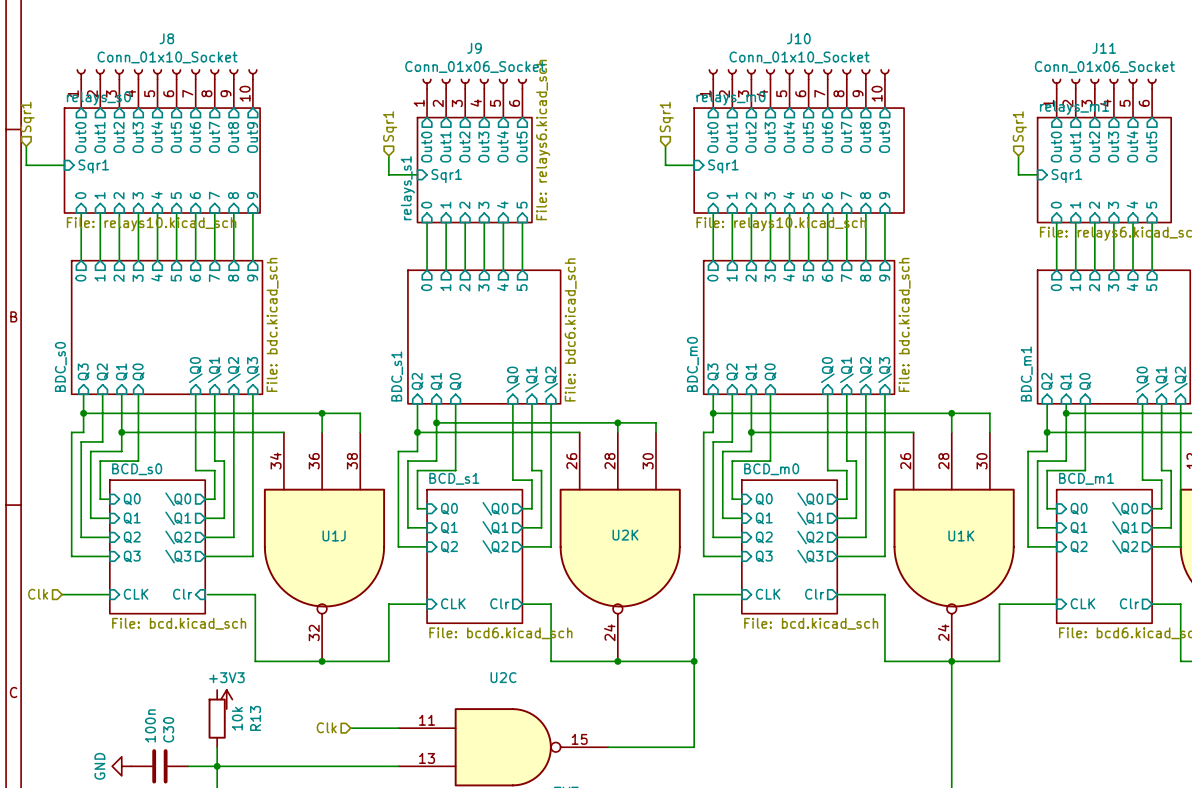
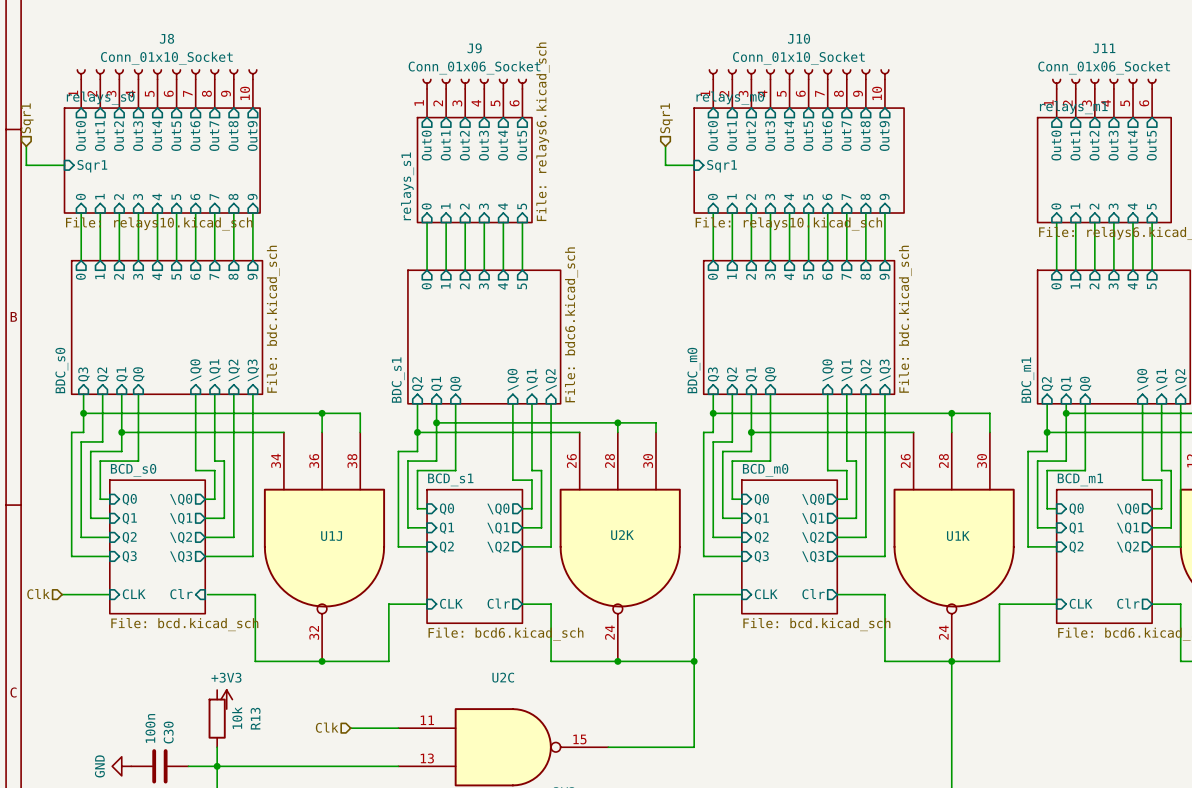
hierarchical label: Sqr1 (390, 126) -> none
hierarchical label: Sqr1 (1019, 126) -> none
wire: (388, 155) (388, 174) (417, 174) -> none
wire: (1018, 155) (1018, 174) (1037, 174) -> none
sheet pin: Sqr1 (446, 176) -> none
sheet pin: Sqr1 (1066, 176) -> none

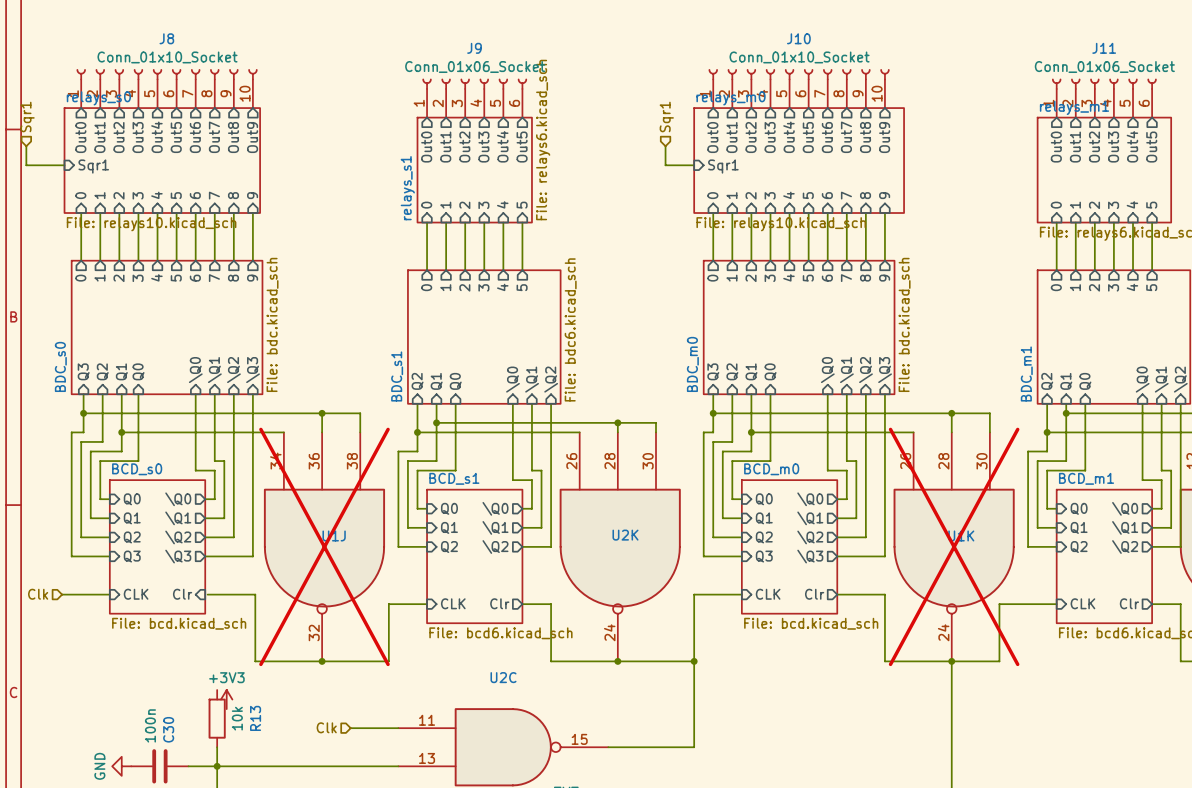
U1J do-not-place cross: none -> (324, 546)
U1K do-not-place cross: none -> (954, 546)

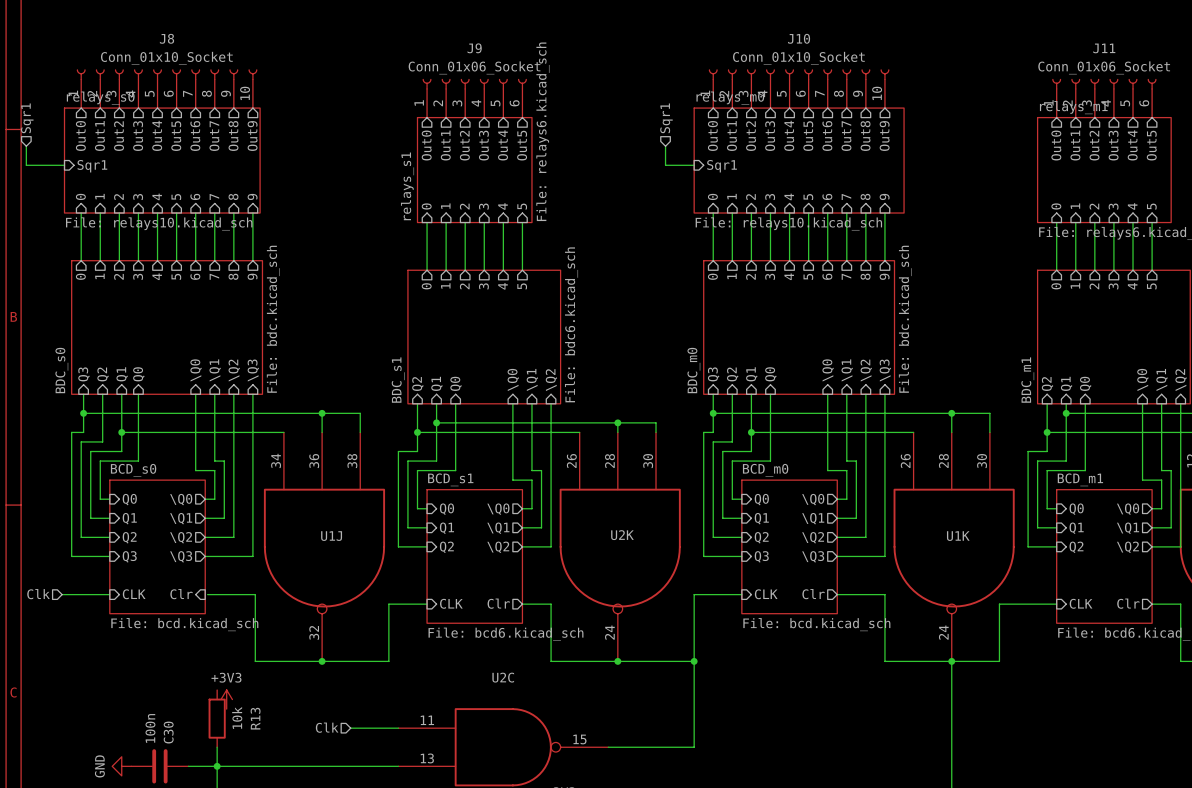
U1J do-not-place cross: (324, 546) -> none
U1K do-not-place cross: (954, 546) -> none

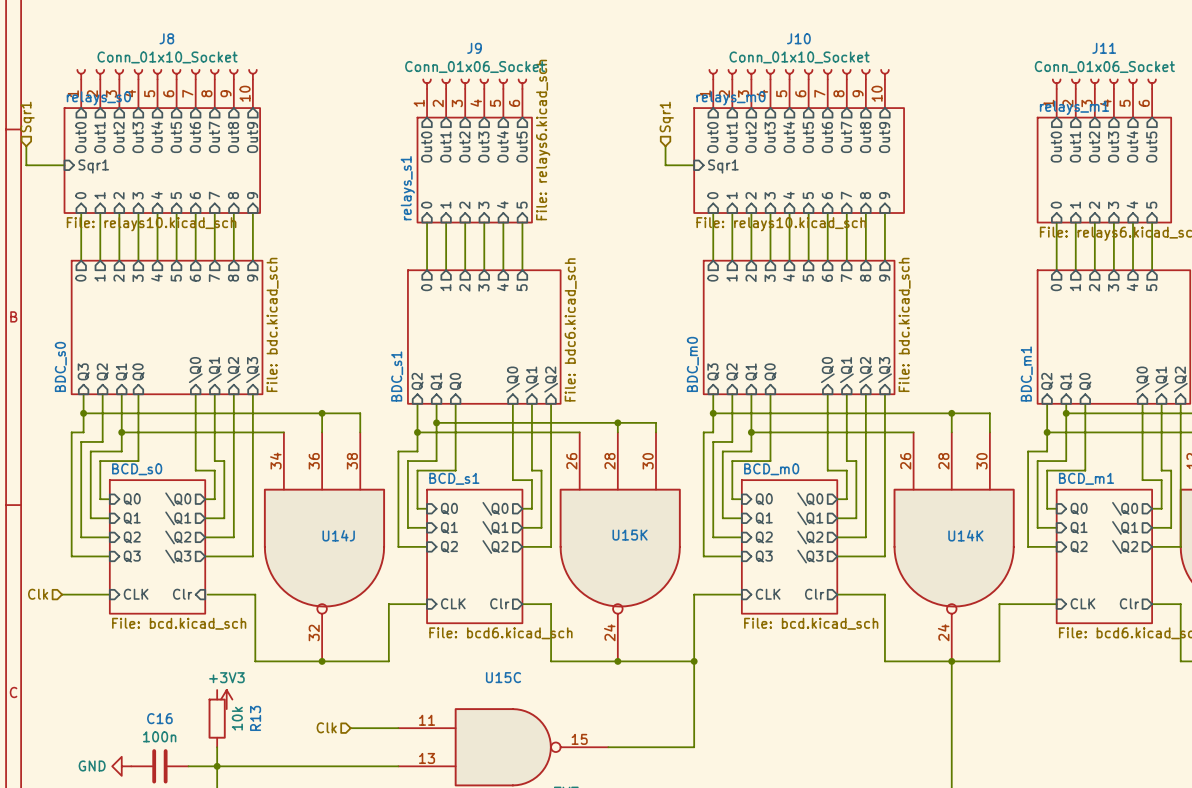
U2K name: U2K (622, 535) -> U15K (630, 535)
U1J name: U1J (331, 536) -> U14J (338, 535)
U1K name: U1K (958, 536) -> U14K (965, 535)
U2C name: U2C (503, 677) -> U15C (503, 677)
C30 value rotation: 0° (150, 728) -> 90° clockwise (159, 736)
C30 name: C30 (168, 732) -> C16 (159, 718)
power symbol text rotation: 0° (99, 766) -> 90° clockwise (92, 765)

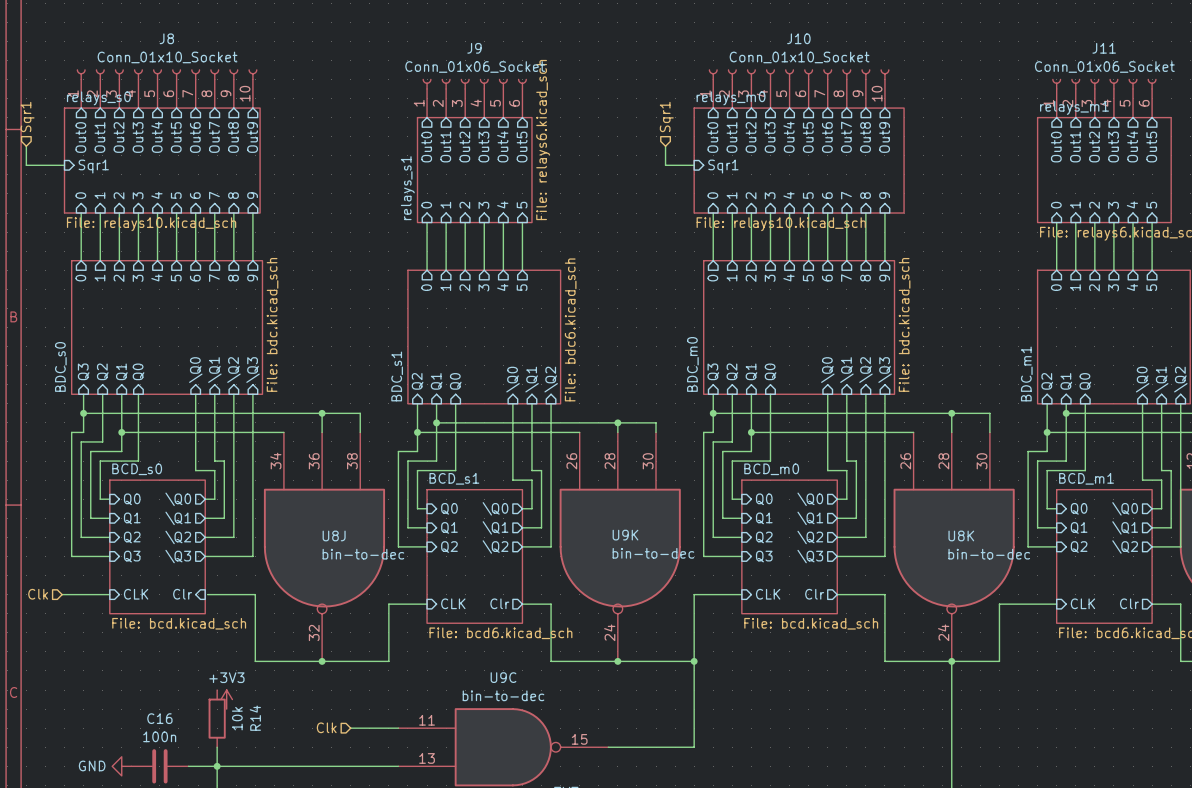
U14J name: U14J (338, 535) -> U8J (334, 535)
U15K name: U15K (630, 535) -> U9K (625, 535)
U14K name: U14K (965, 535) -> U8K (961, 535)
U15K value: none -> bin-to-dec (653, 553)
U14J value: none -> bin-to-dec (363, 554)
U14K value: none -> bin-to-dec (989, 554)
U15C name: U15C (503, 677) -> U9C (503, 677)
U15C value: none -> bin-to-dec (503, 695)
R13 name: R13 (255, 718) -> R14 (255, 718)

